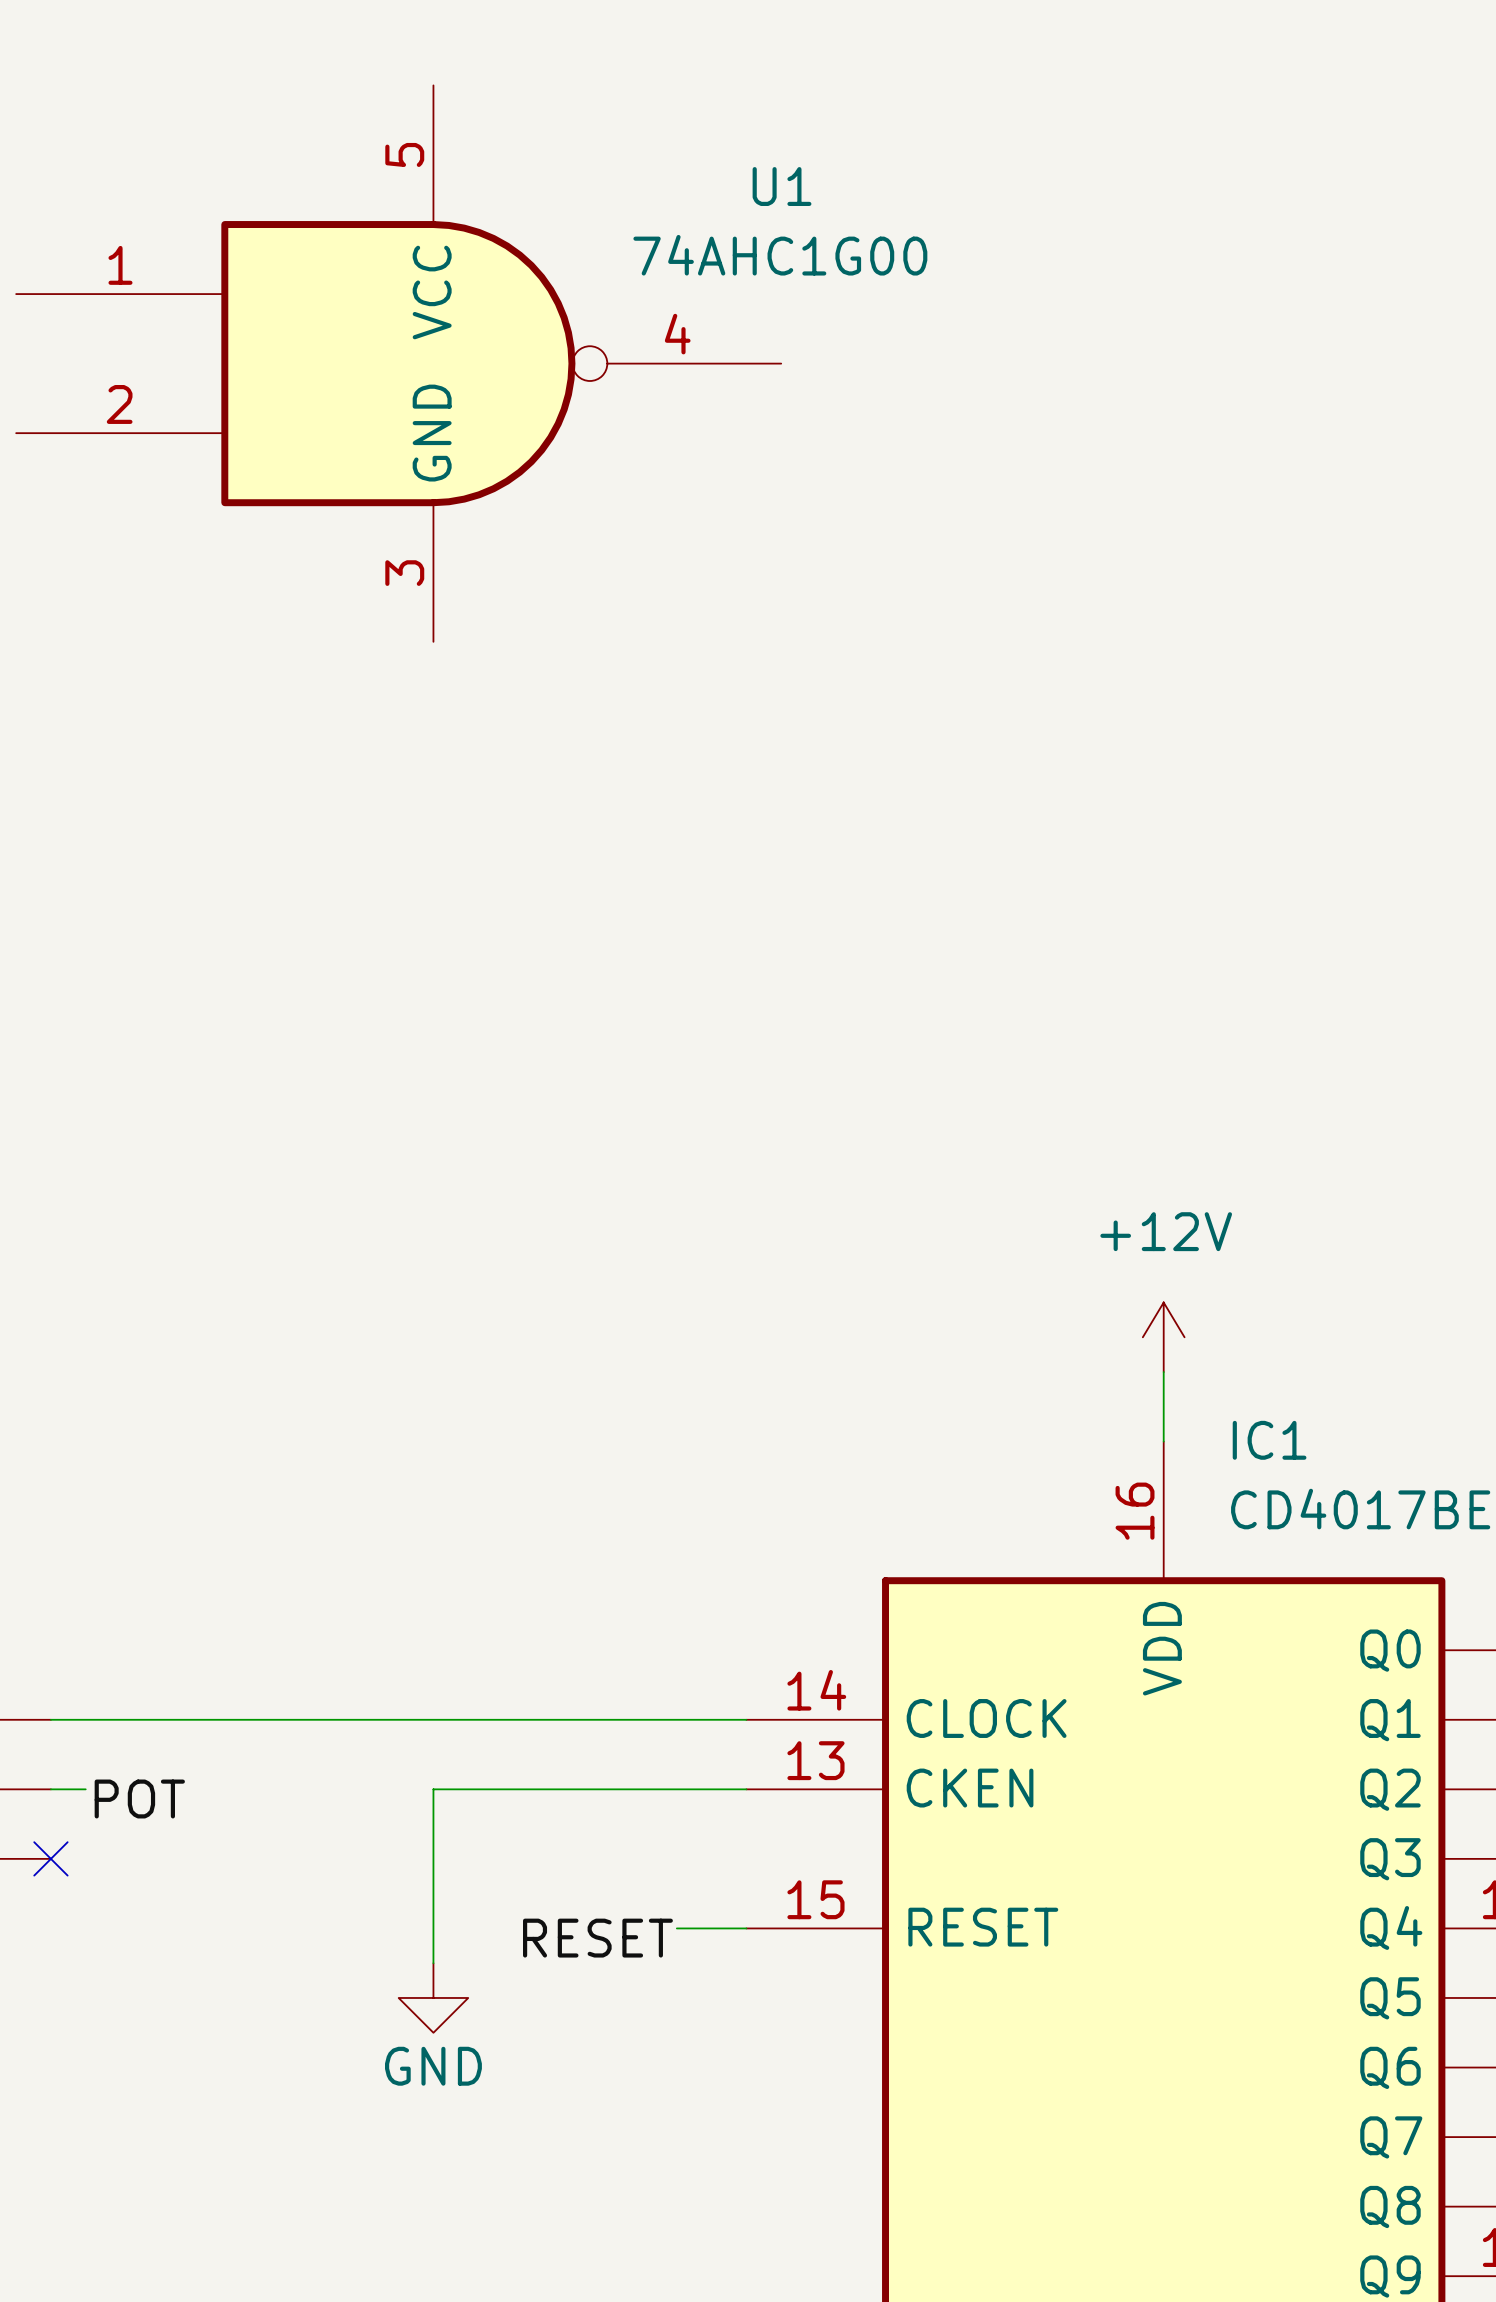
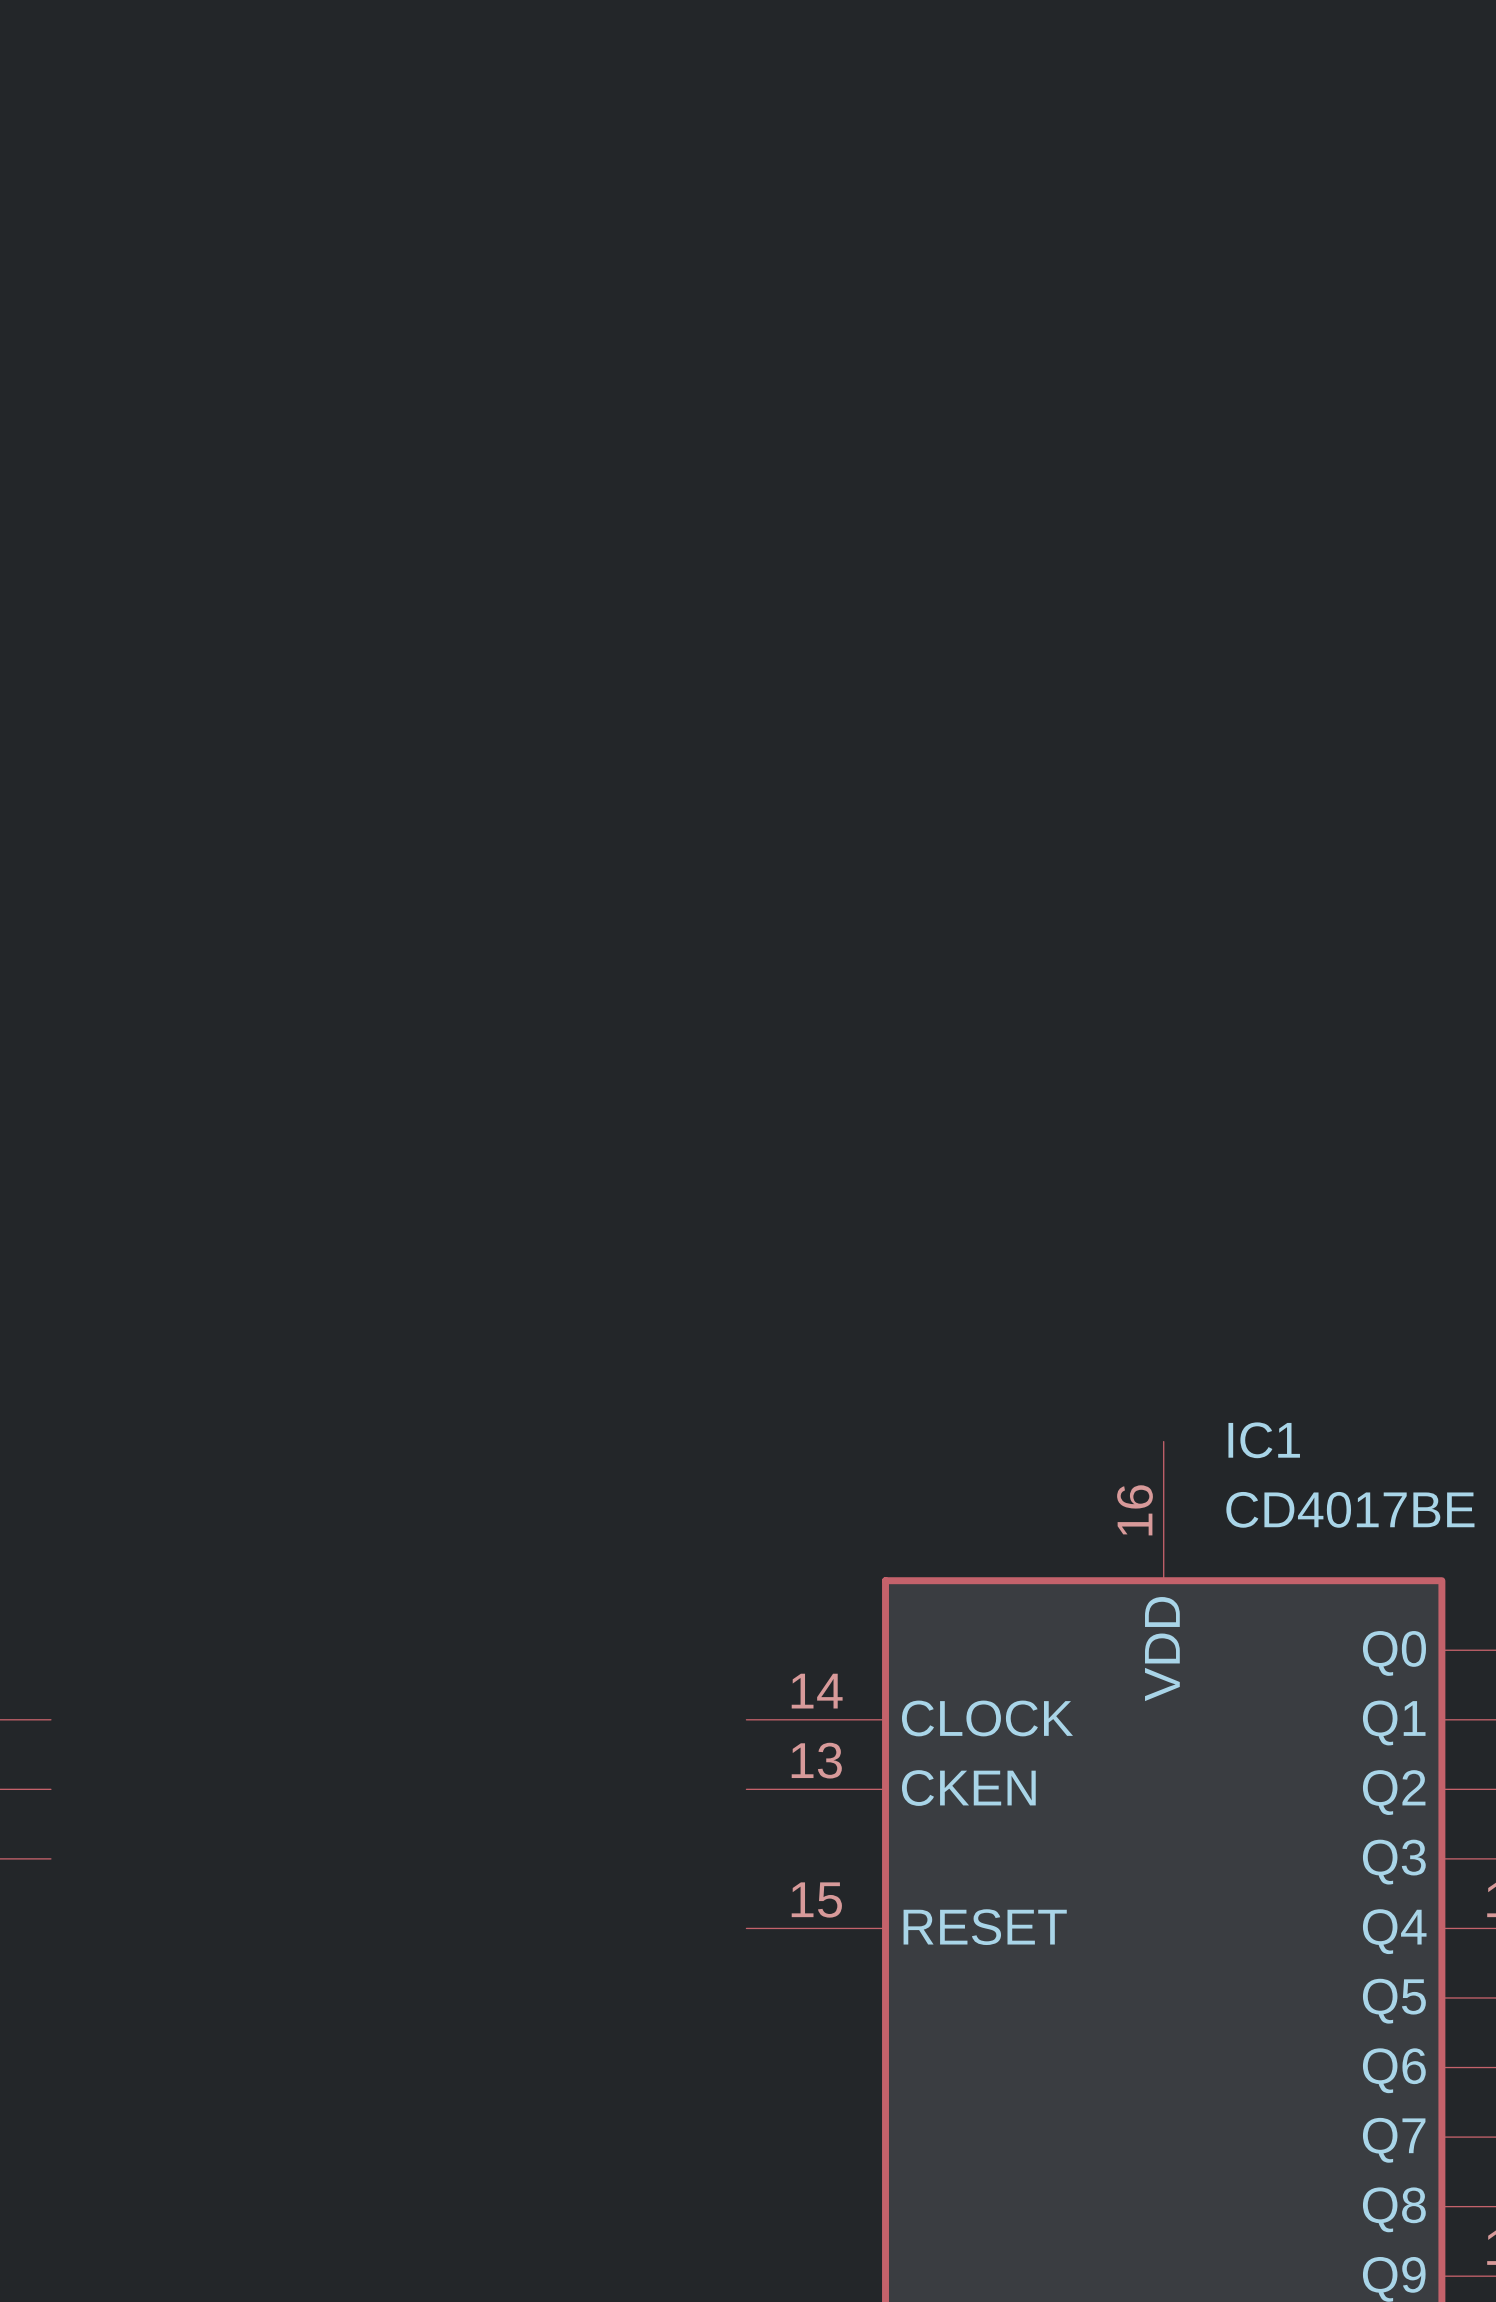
U1: 74AHC1G00 (398, 363) -> none
power symbol: +12V (1163, 1337) -> none
wire: (1163, 1372) (1163, 1441) -> none
wire: (50, 1719) (746, 1719) -> none
wire: (50, 1789) (85, 1789) -> none
wire: (746, 1789) (433, 1789) (433, 1963) -> none
label: POT (139, 1799) -> none
no-connect mark: (50, 1858) -> none
wire: (676, 1928) (746, 1928) -> none
label: RESET (597, 1938) -> none
power symbol: GND (433, 1997) -> none

